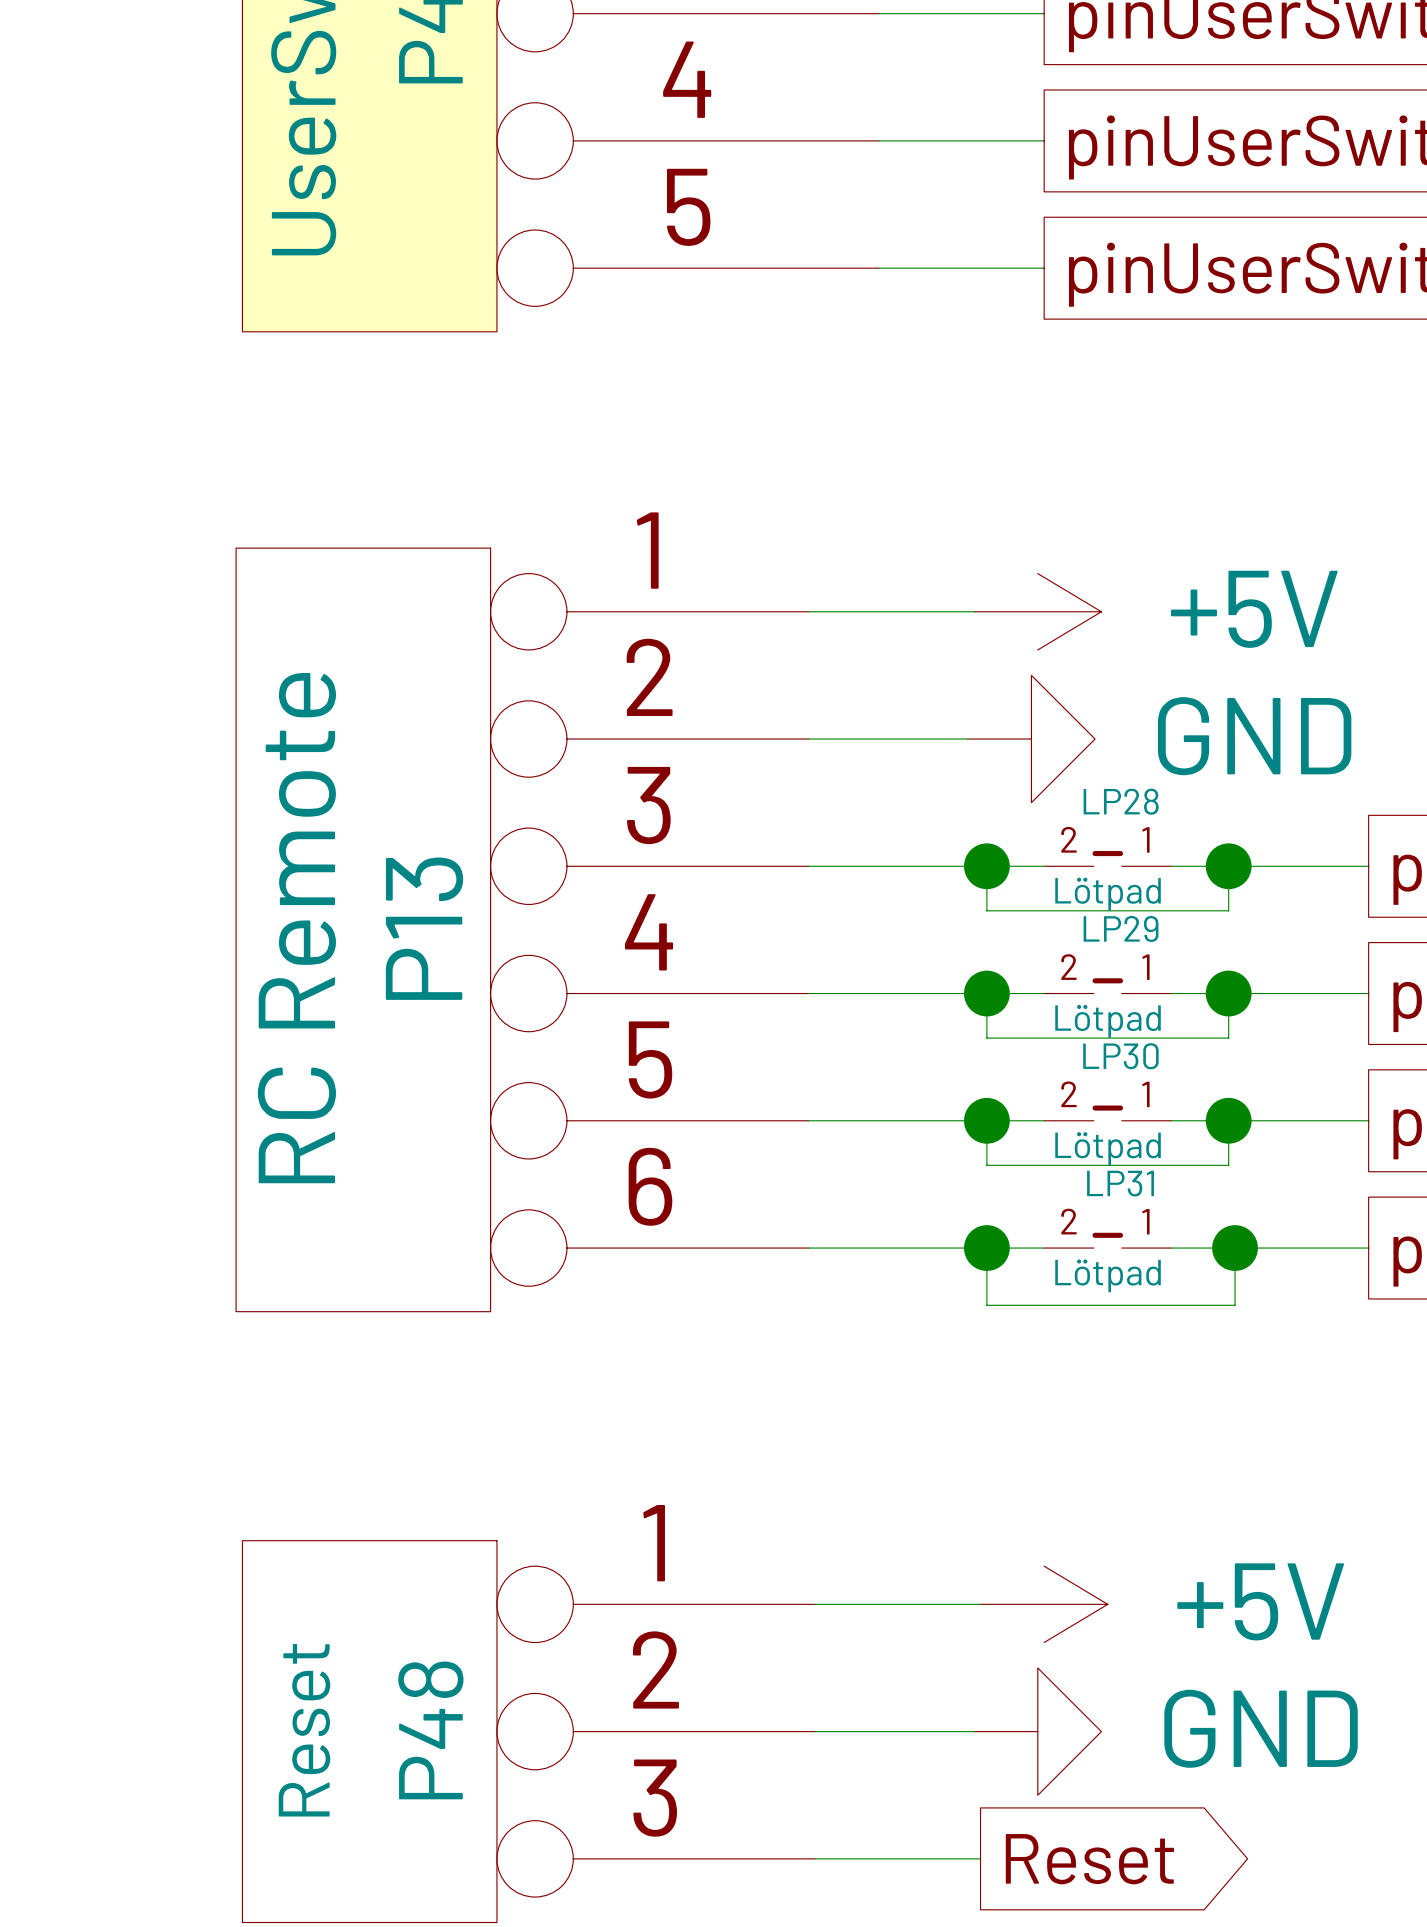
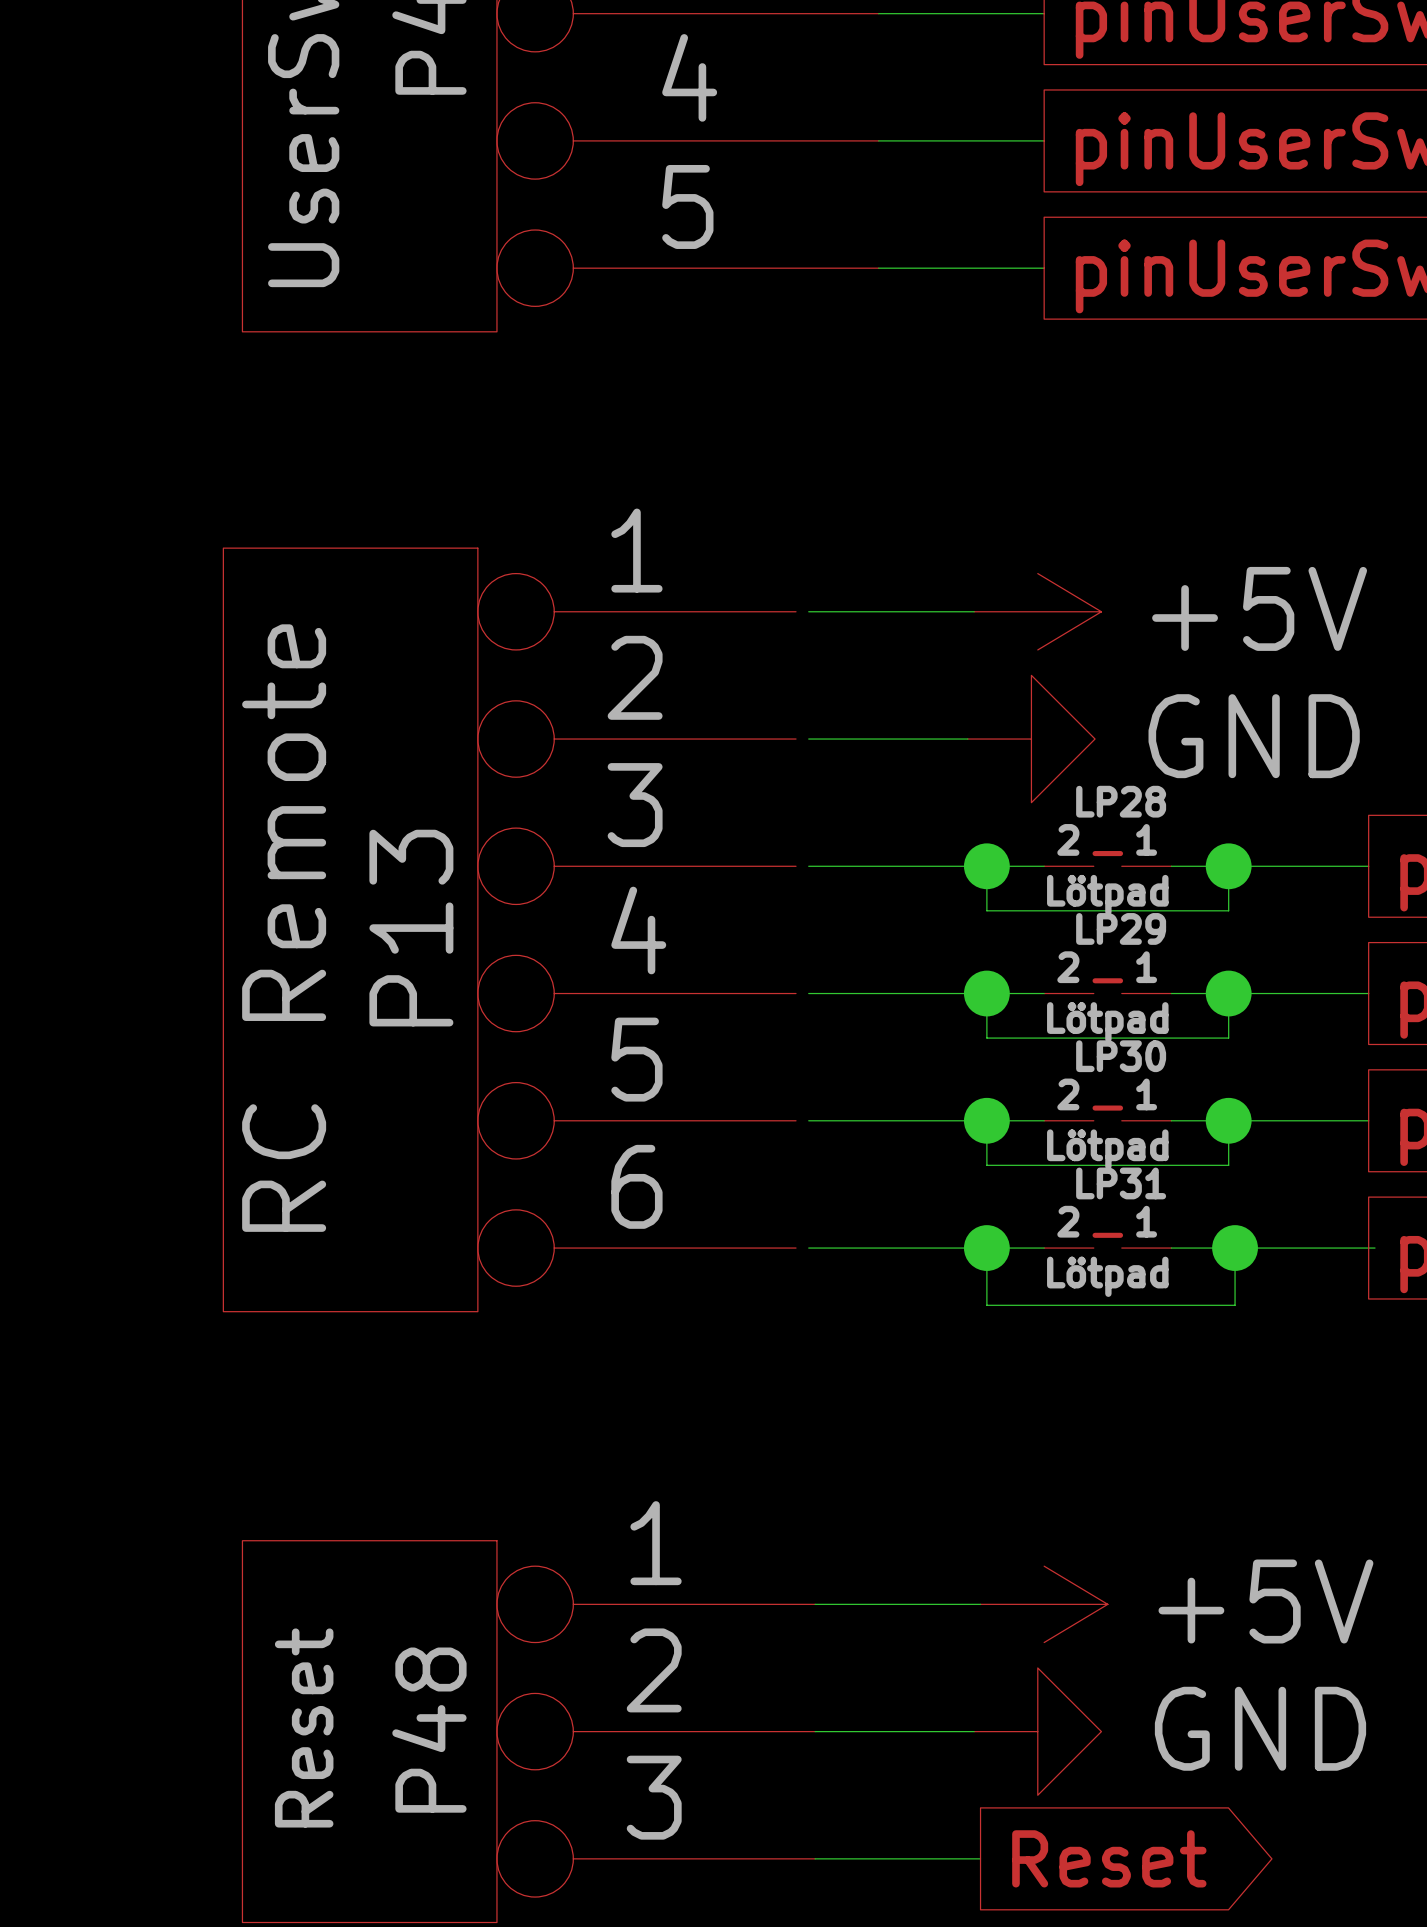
P13 position: (522, 929) -> (509, 929)
wire: none -> (1368, 1248) (1375, 1248)

